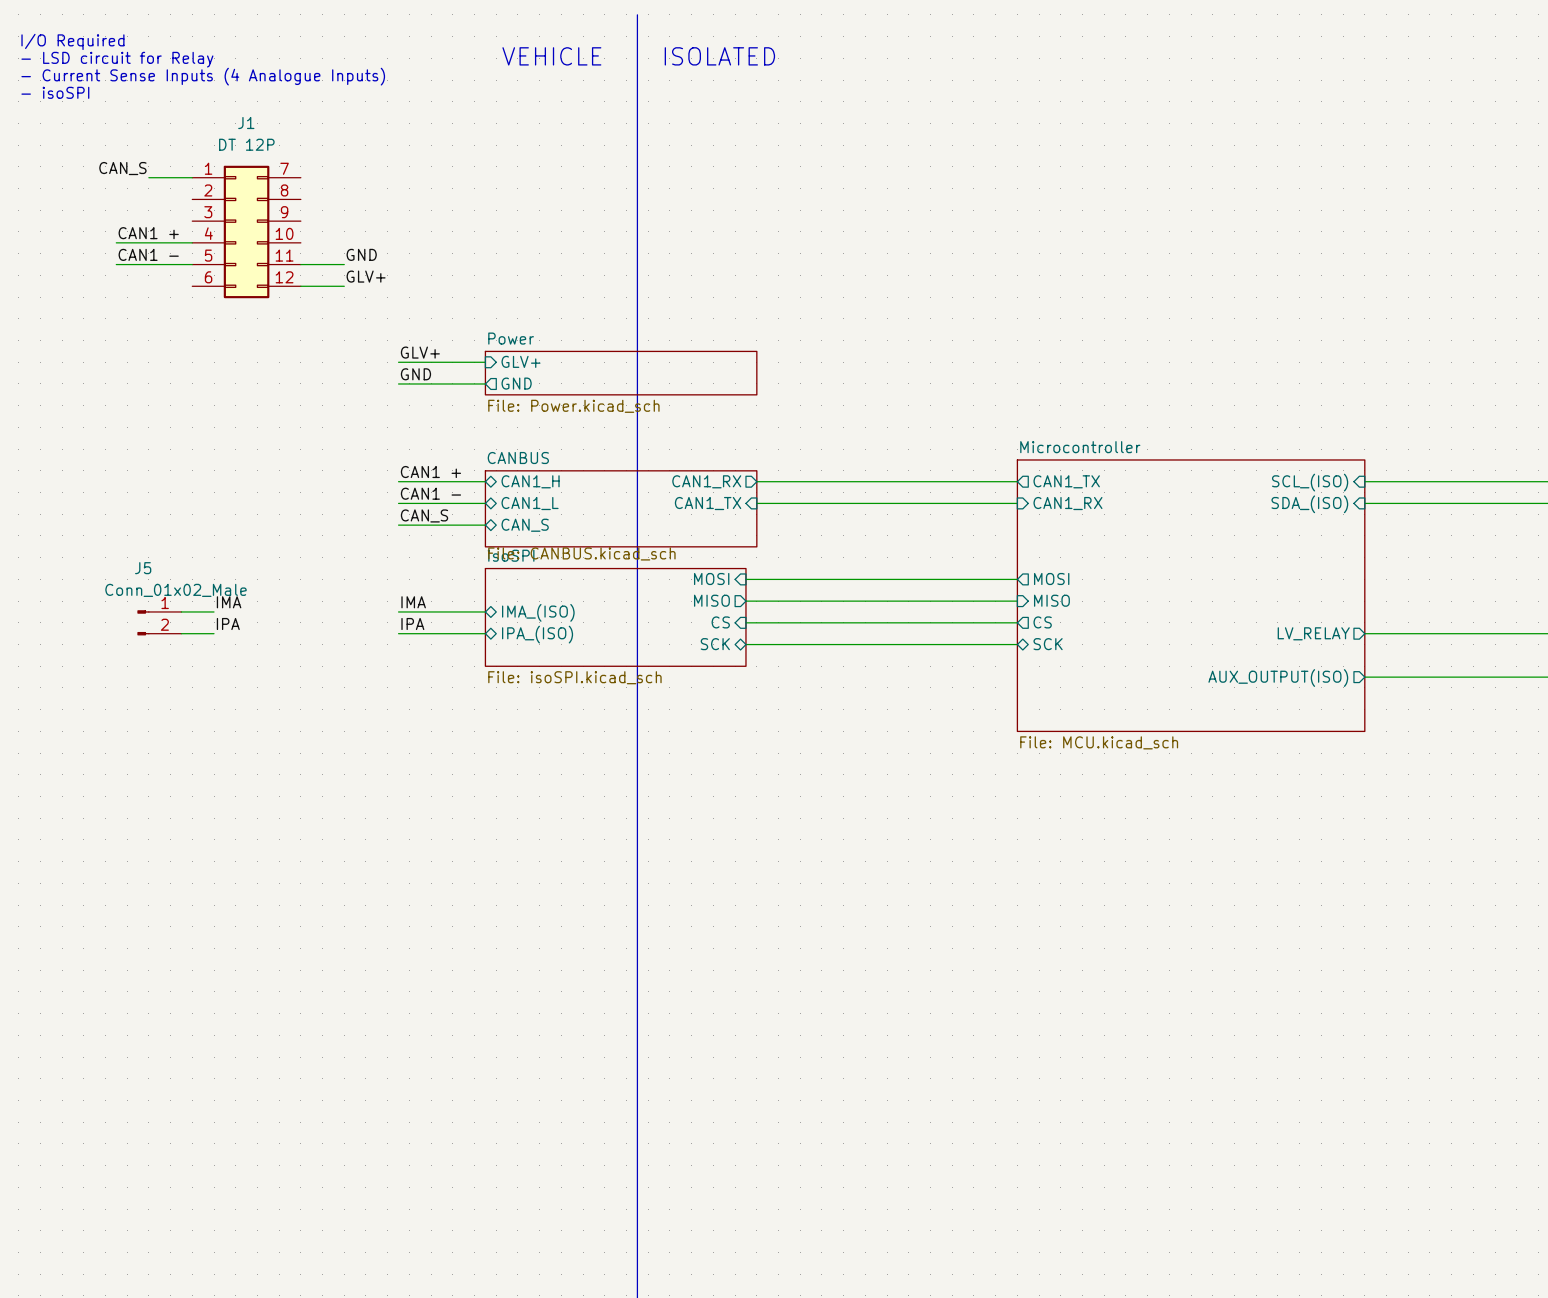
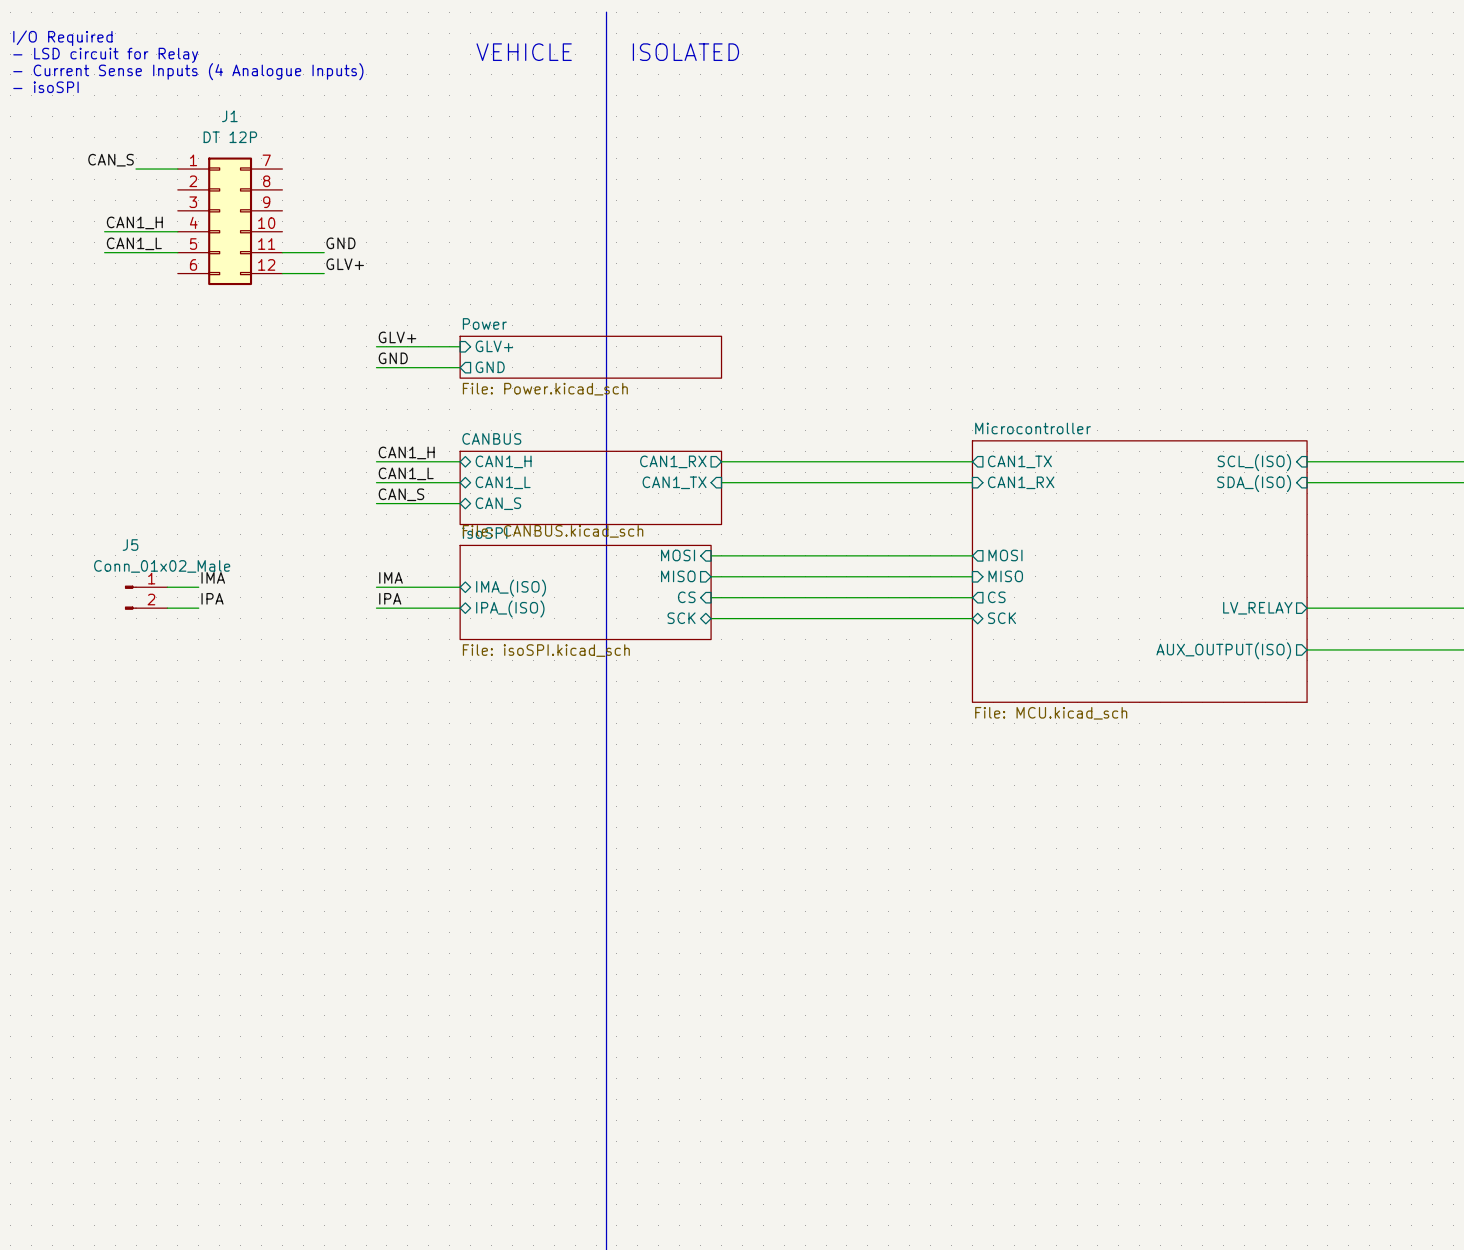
label: CAN1 + (148, 233) -> CAN1_H (134, 222)
label: CAN1 - (148, 254) -> CAN1_L (134, 243)
label: CAN1 + (430, 472) -> CAN1_H (406, 452)
label: CAN1 - (430, 493) -> CAN1_L (406, 473)

